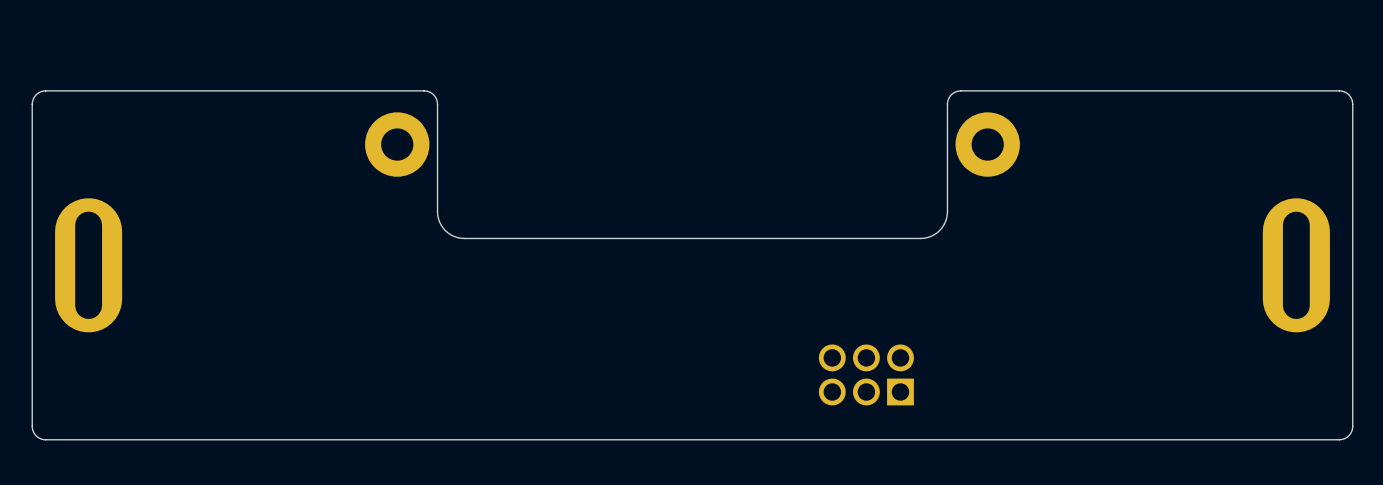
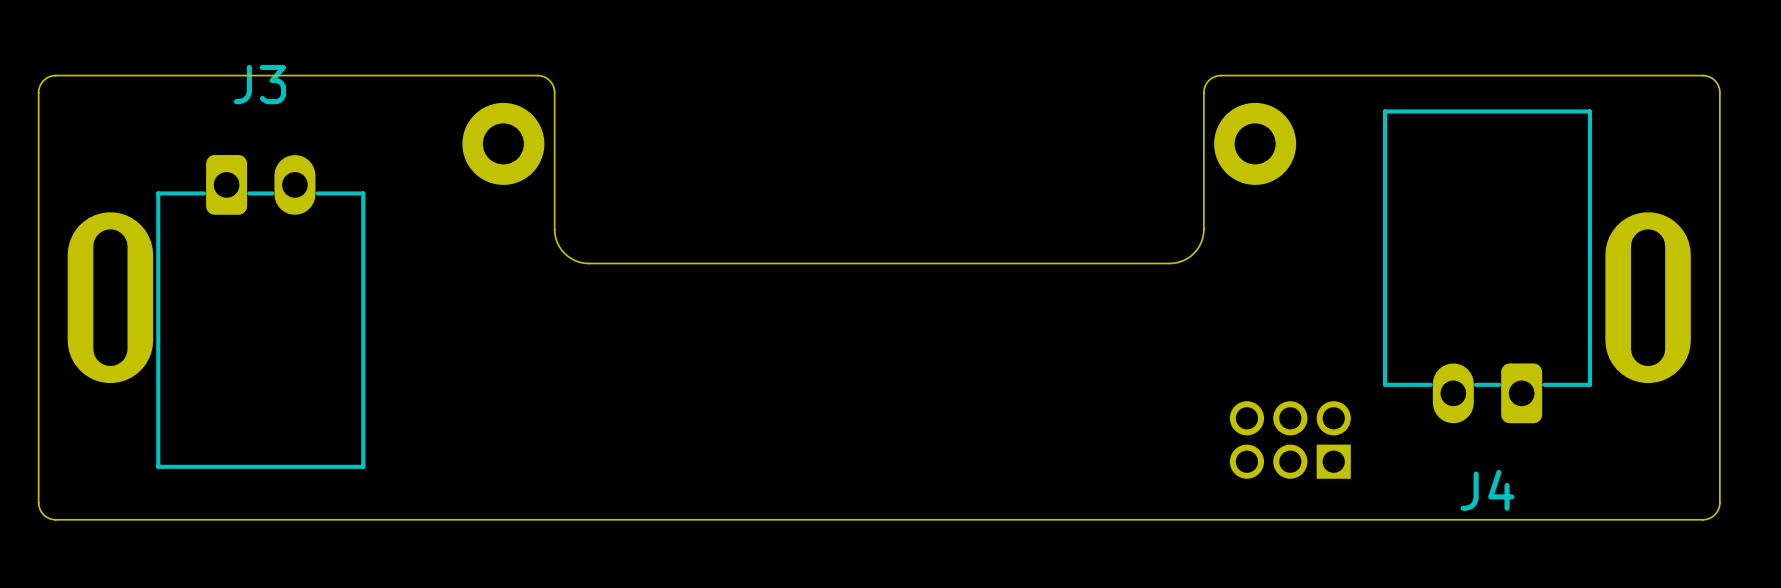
J4: none -> (1487, 266)
J3: none -> (260, 311)
part position: (866, 374) -> (1290, 439)

